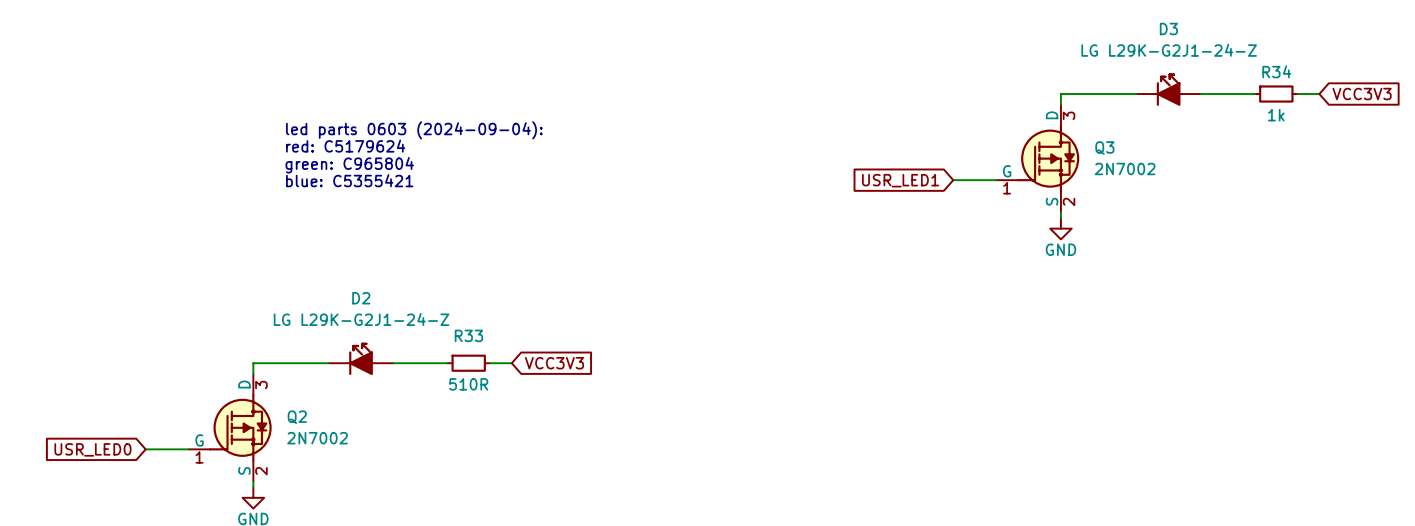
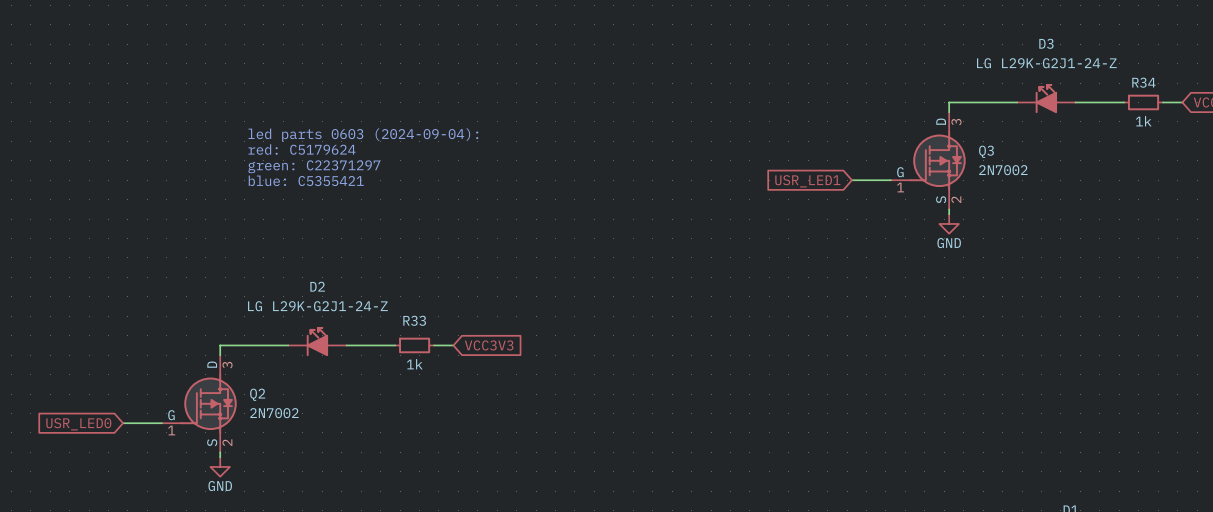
text: green: C965804 (349, 165) -> green: C22371297 (314, 166)
R33 text: 510R (468, 384) -> 1k (414, 364)

